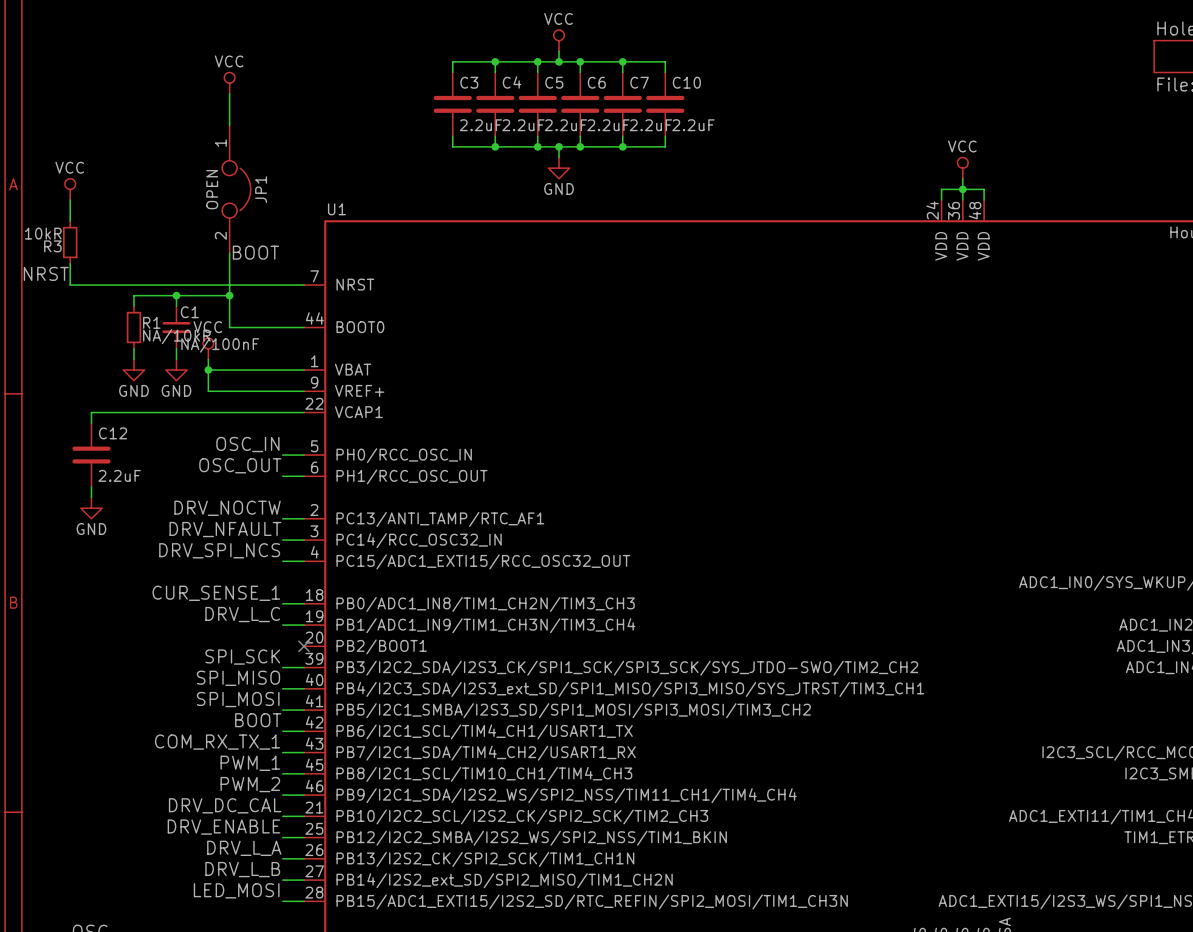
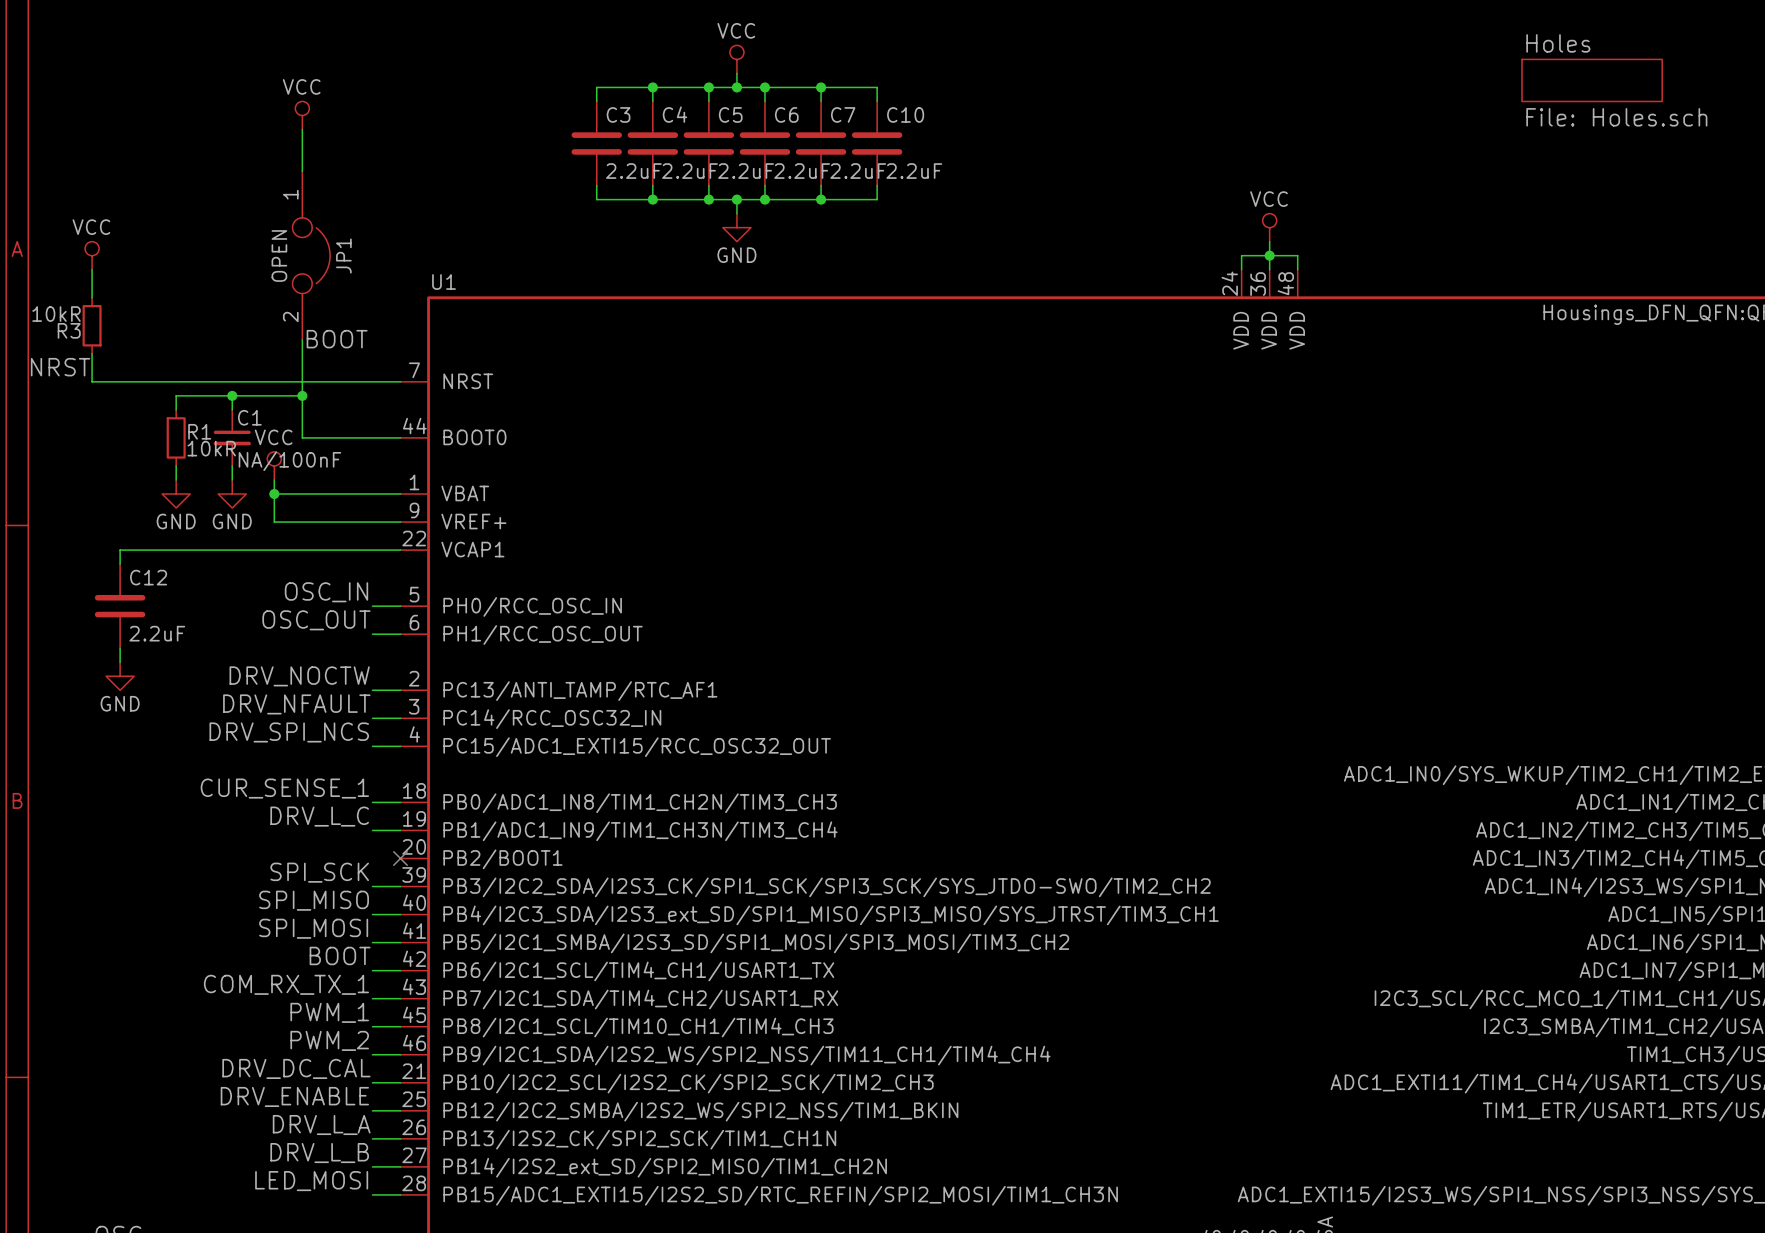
R1 value: NA/10kR (176, 336) -> 10kR (211, 448)

